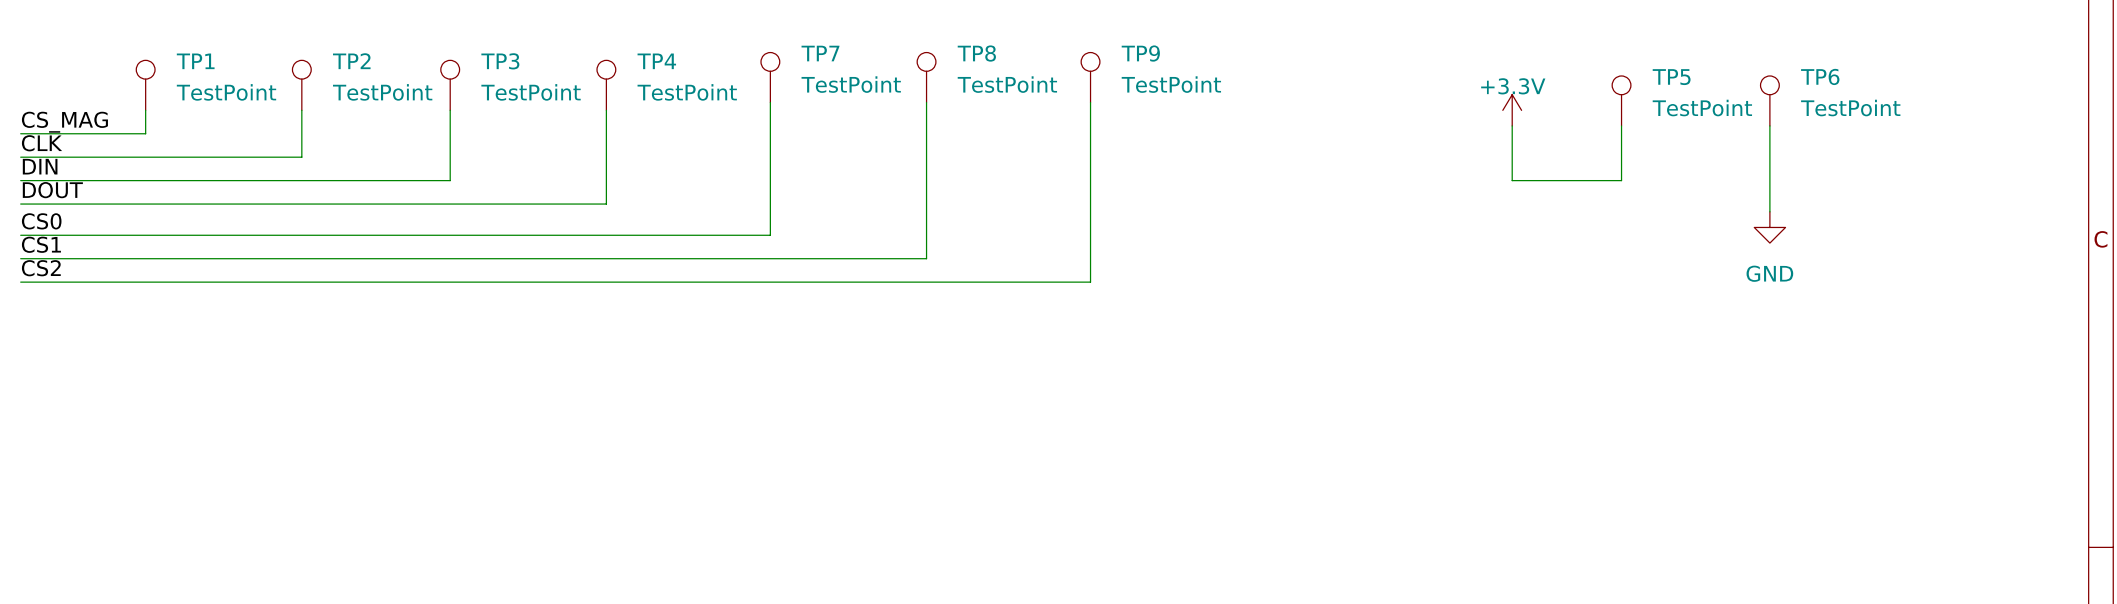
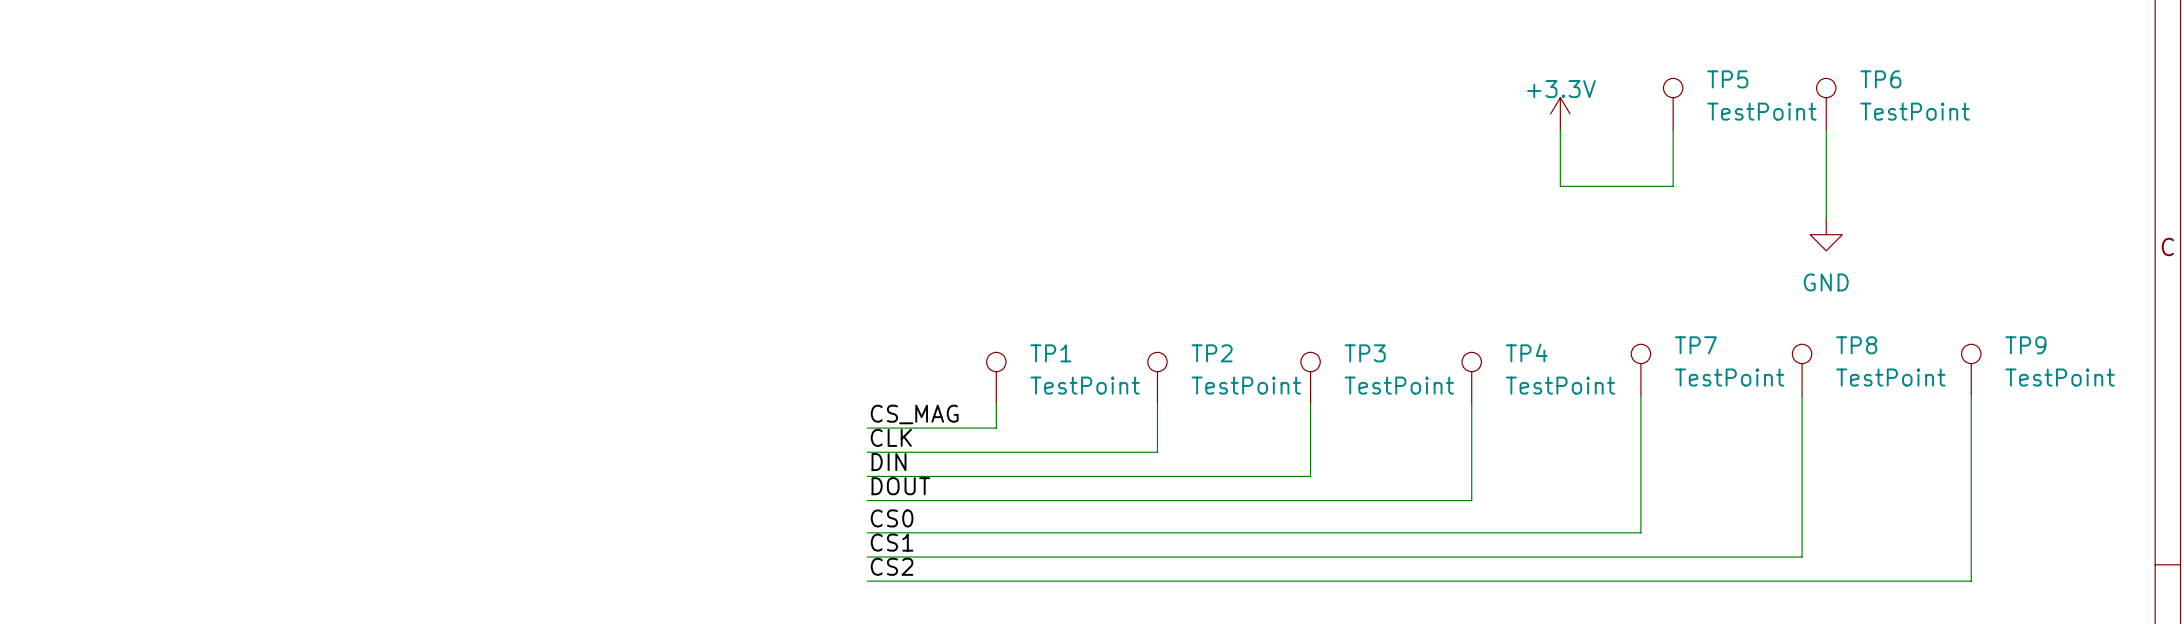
TP7 position: (770, 77) -> (1640, 370)
TP8 position: (926, 77) -> (1802, 370)
TP9 position: (1090, 77) -> (1971, 370)
TP1 position: (145, 85) -> (996, 378)
TP2 position: (301, 85) -> (1157, 378)
TP3 position: (450, 85) -> (1310, 378)
TP4 position: (606, 85) -> (1471, 378)
wire: (770, 102) (770, 235) (20, 235) -> none
wire: (926, 102) (926, 258) (20, 258) -> none
wire: (1090, 102) (1090, 282) (20, 282) -> none
wire: (145, 110) (145, 133) (20, 133) -> none
wire: (301, 110) (301, 157) (20, 157) -> none
wire: (450, 110) (450, 180) (20, 180) -> none
wire: (606, 110) (606, 204) (20, 204) -> none
label: CS_MAG (64, 122) -> none
label: CLK (42, 143) -> none
label: DIN (40, 166) -> none
label: DOUT (52, 190) -> none
label: CS0 (41, 221) -> none
label: CS1 (41, 244) -> none
label: CS2 (41, 268) -> none
wire: none -> (1640, 395) (1640, 532) (867, 532)
wire: none -> (1802, 395) (1802, 557) (867, 557)
wire: none -> (1971, 395) (1971, 581) (867, 581)
wire: none -> (996, 403) (996, 428) (867, 428)
wire: none -> (1157, 403) (1157, 452) (867, 452)
wire: none -> (1310, 403) (1310, 476) (867, 476)
wire: none -> (1471, 403) (1471, 500) (867, 500)
label: none -> CS_MAG (914, 414)
label: none -> CLK (891, 437)
label: none -> DIN (889, 462)
label: none -> DOUT (900, 486)
label: none -> CS0 (892, 518)
label: none -> CS1 (892, 542)
label: none -> CS2 (892, 566)

